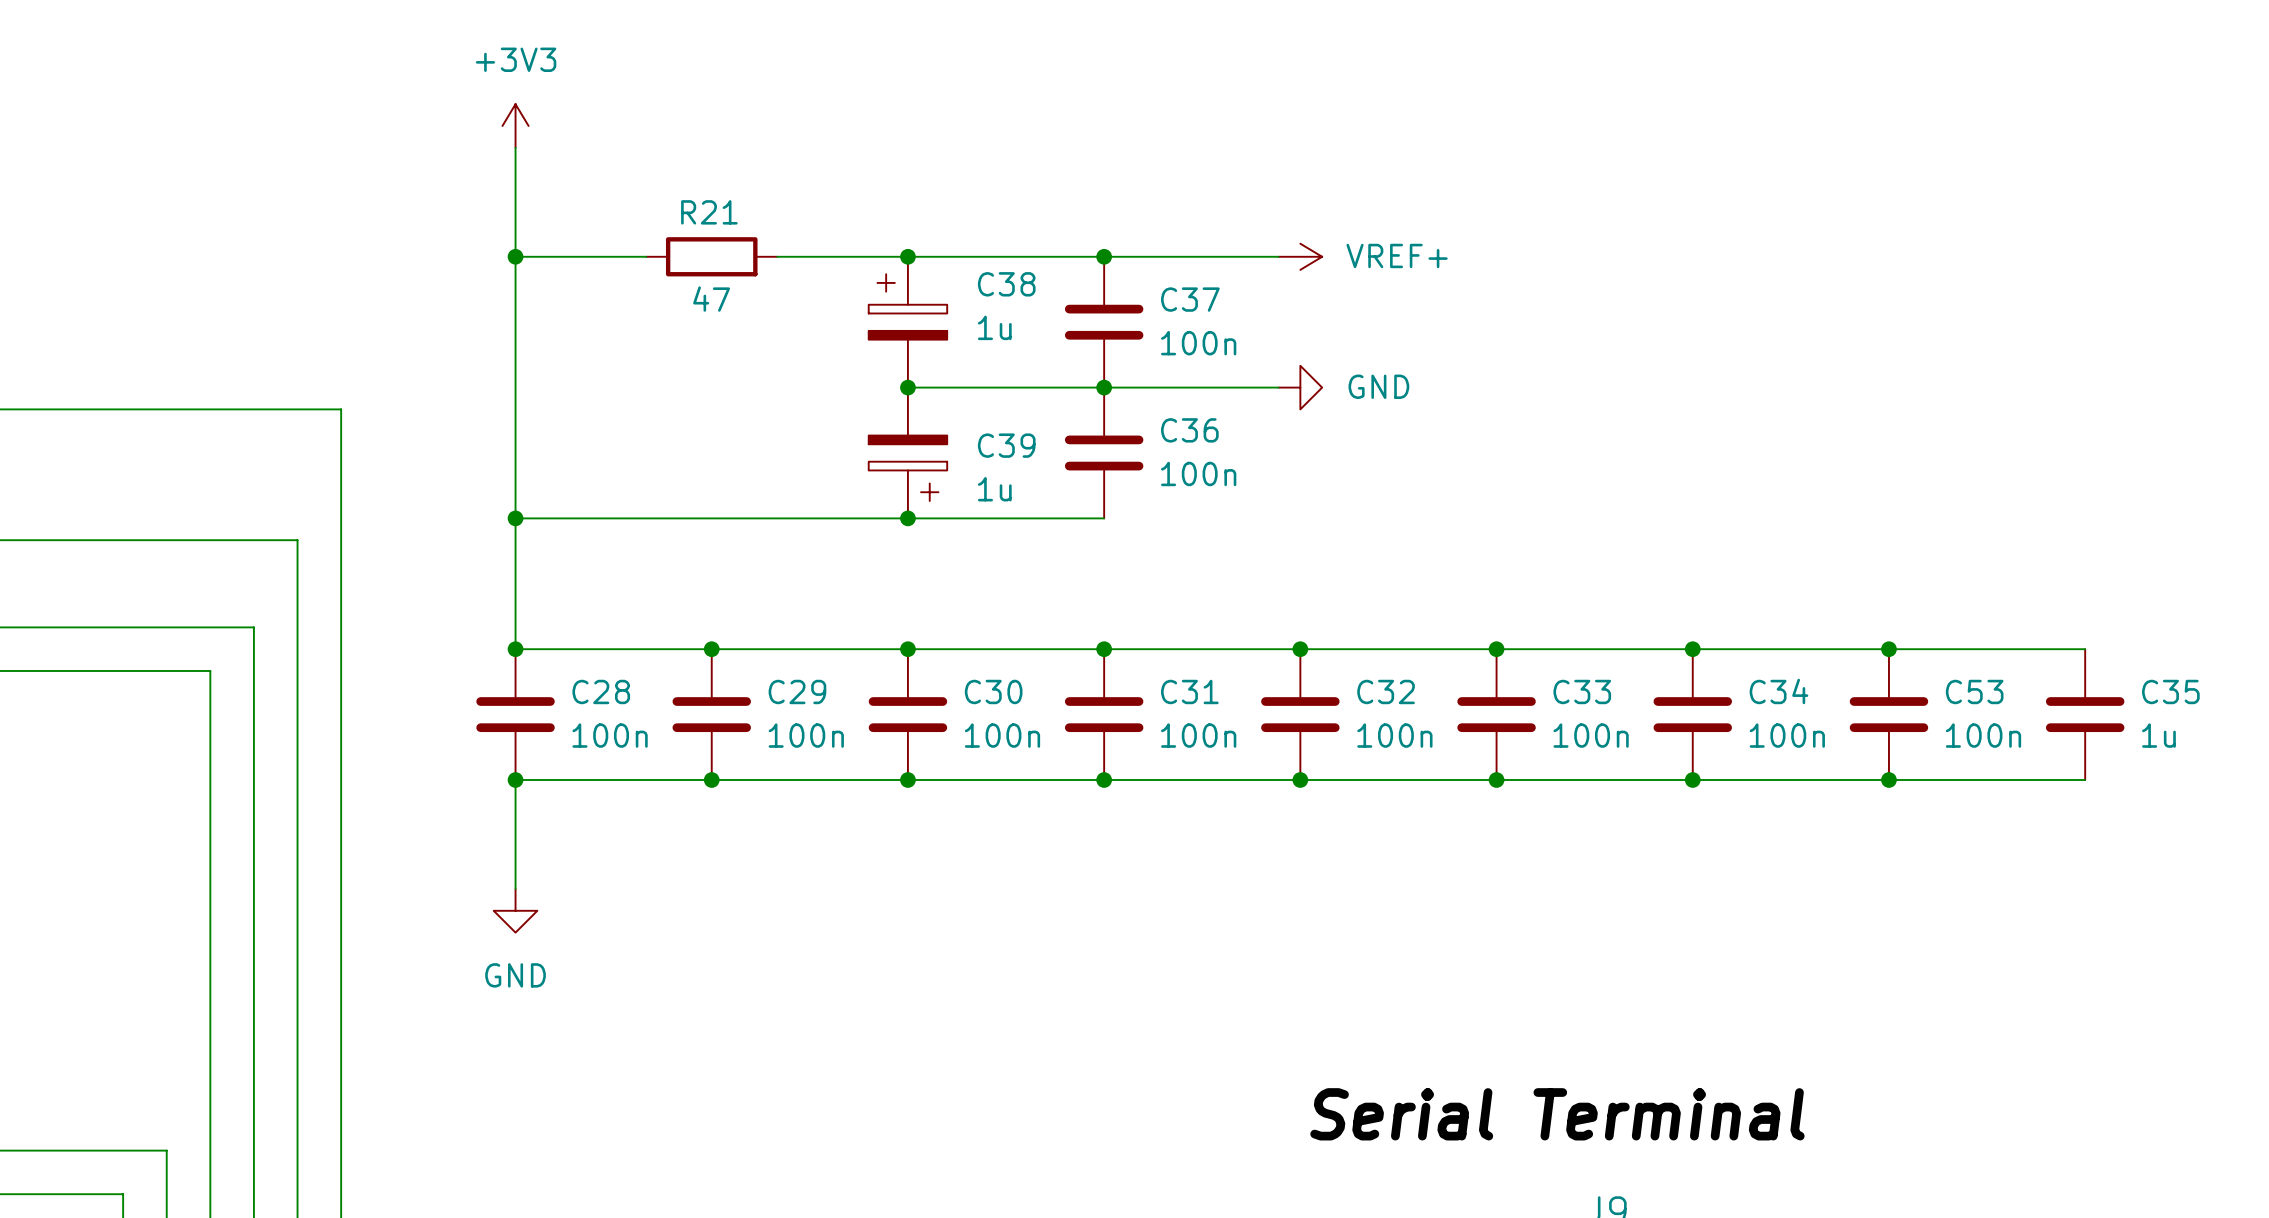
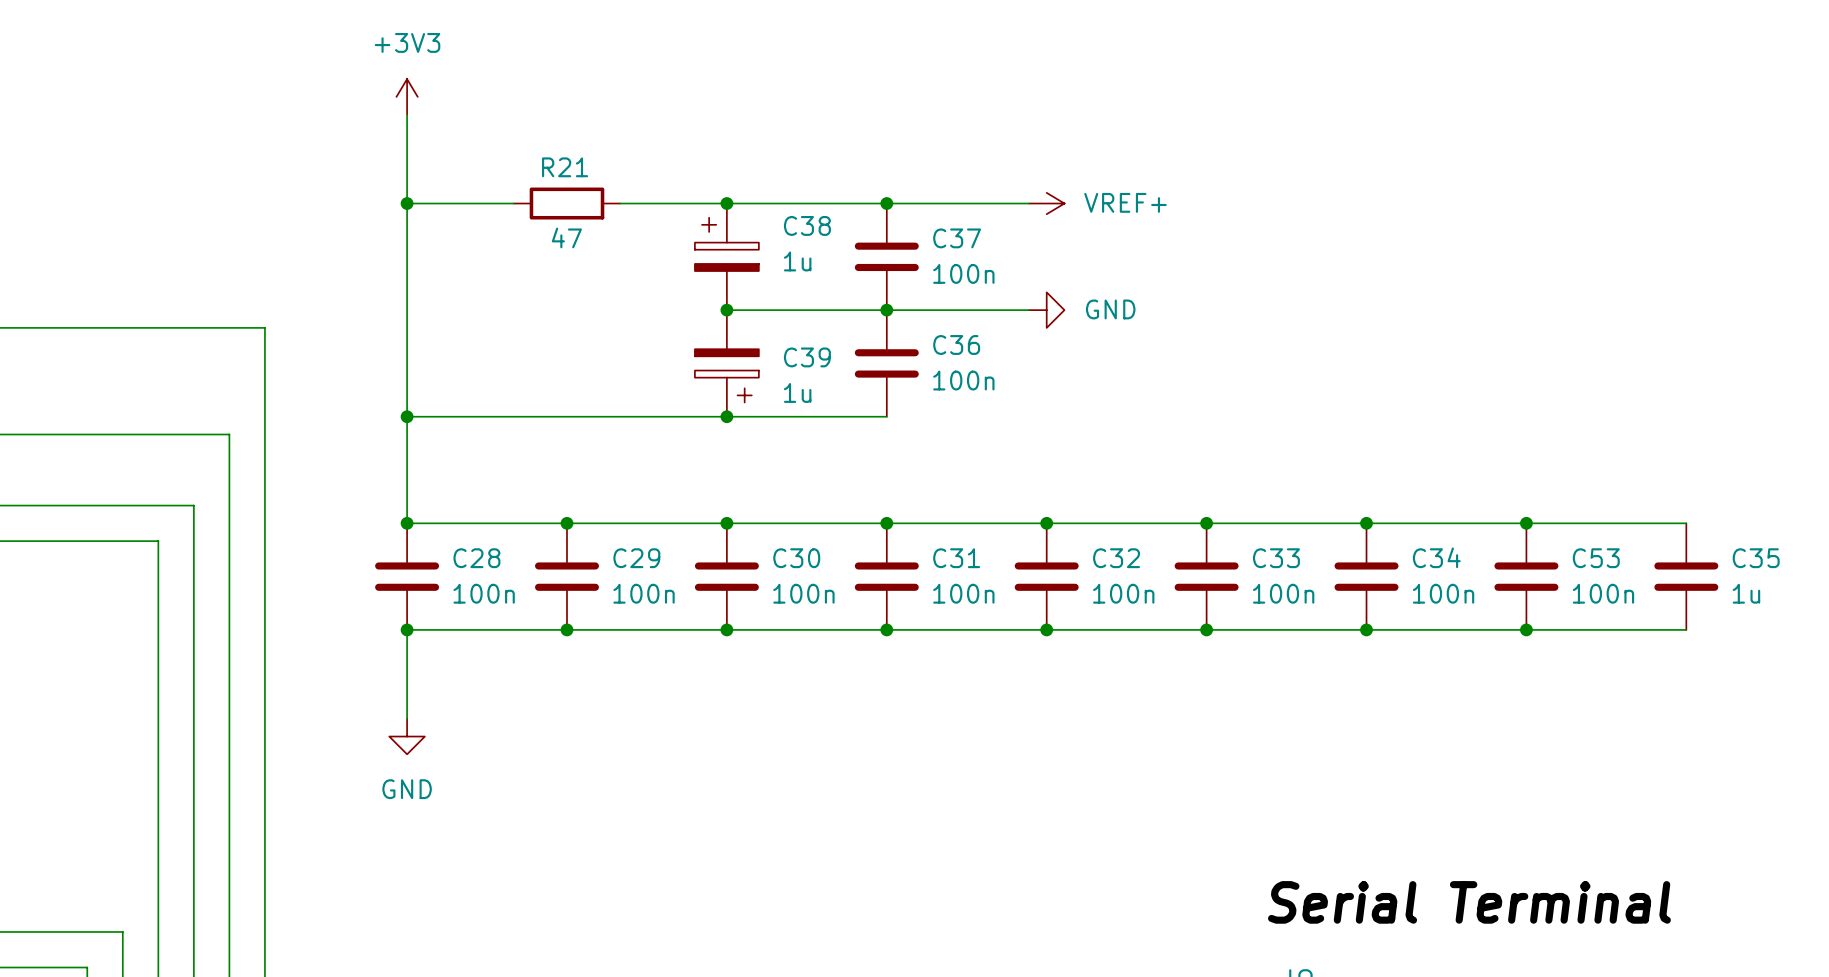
label position: Serial Terminal (1557, 1114) -> Serial Terminal (1469, 902)

